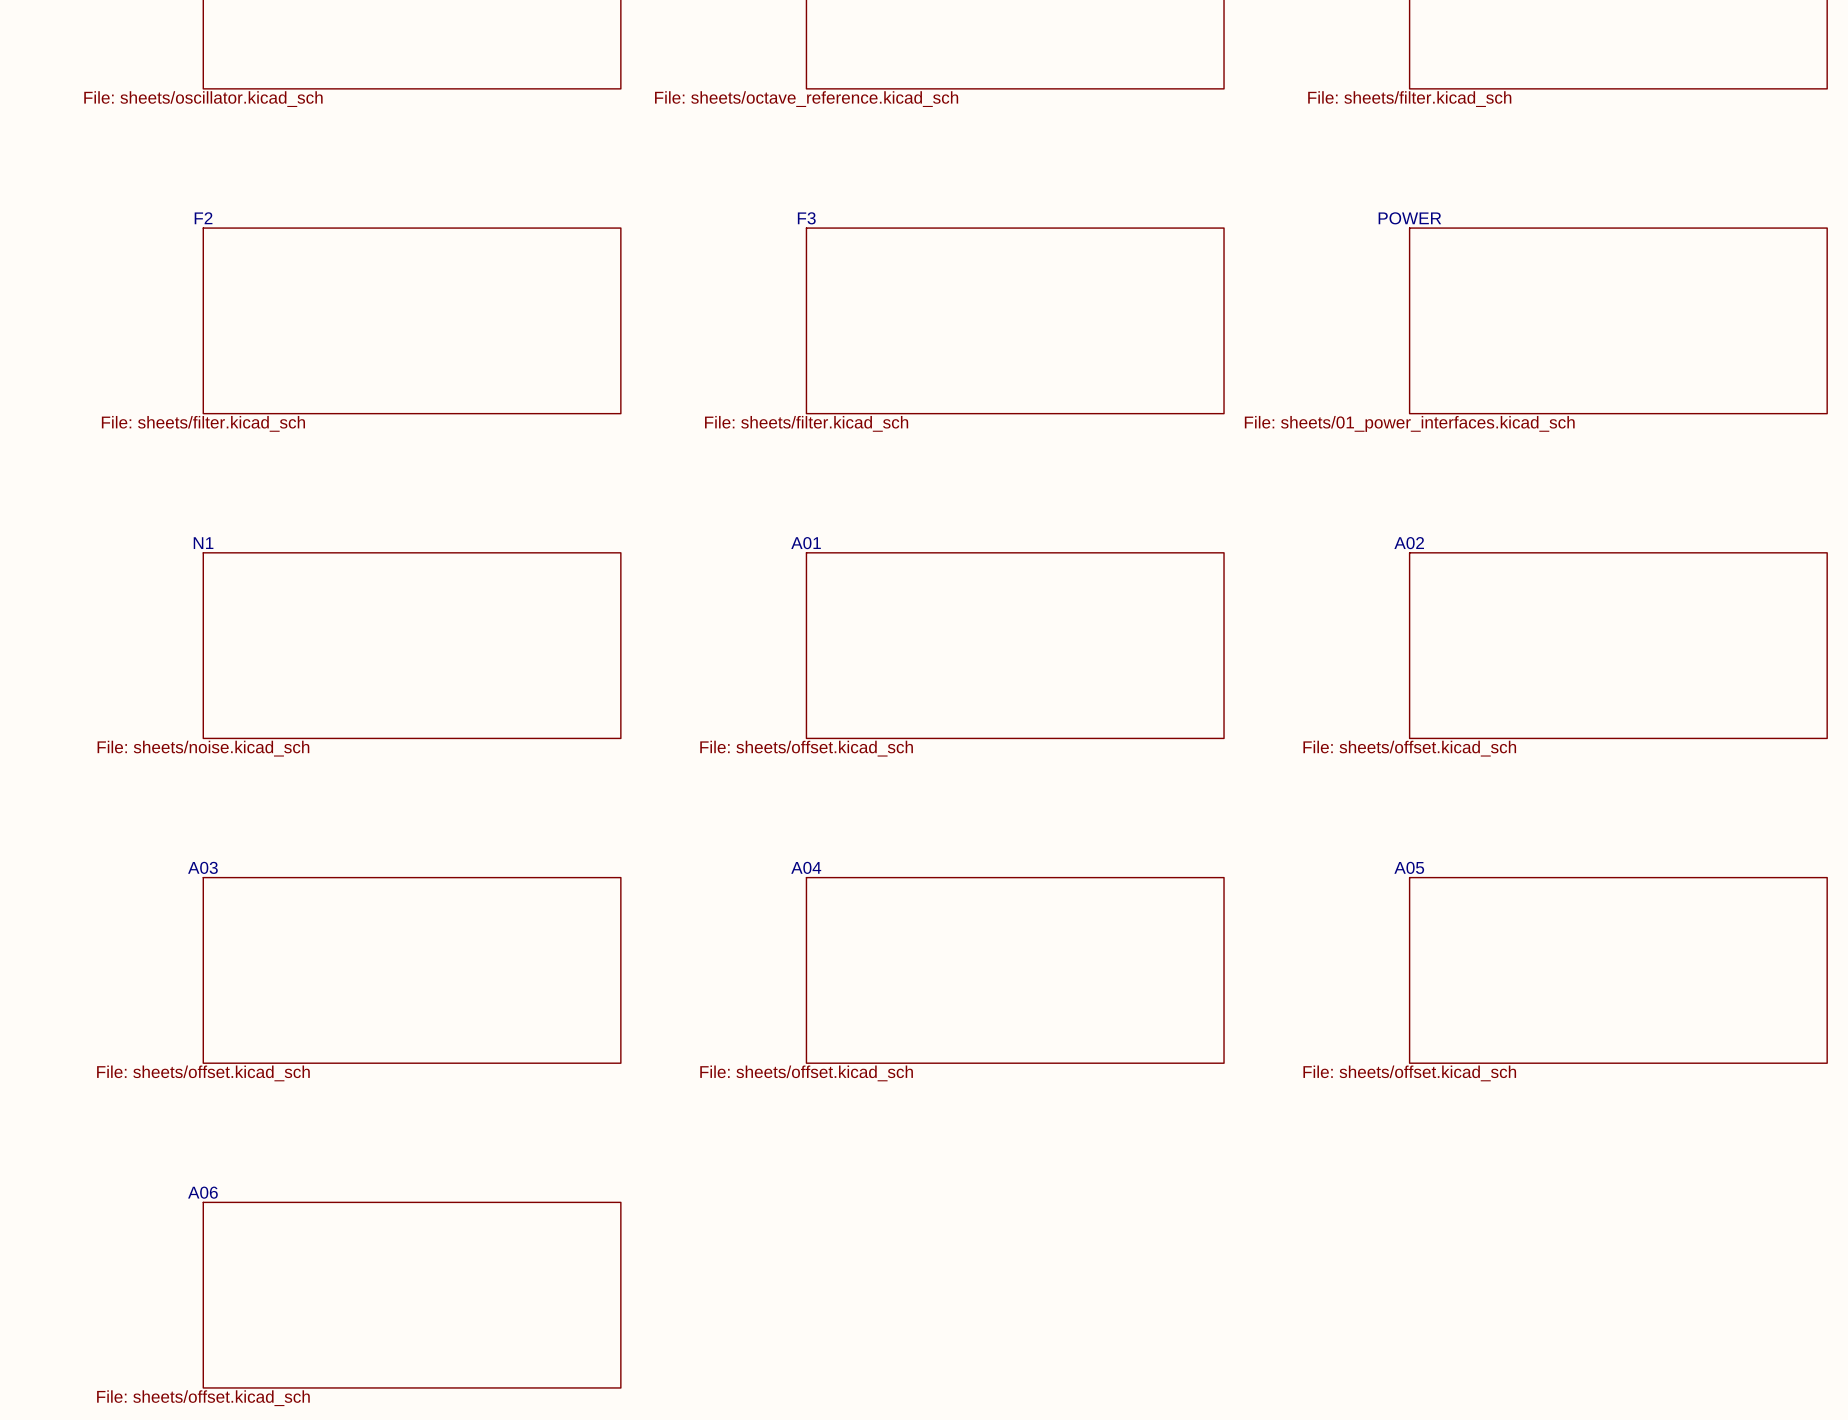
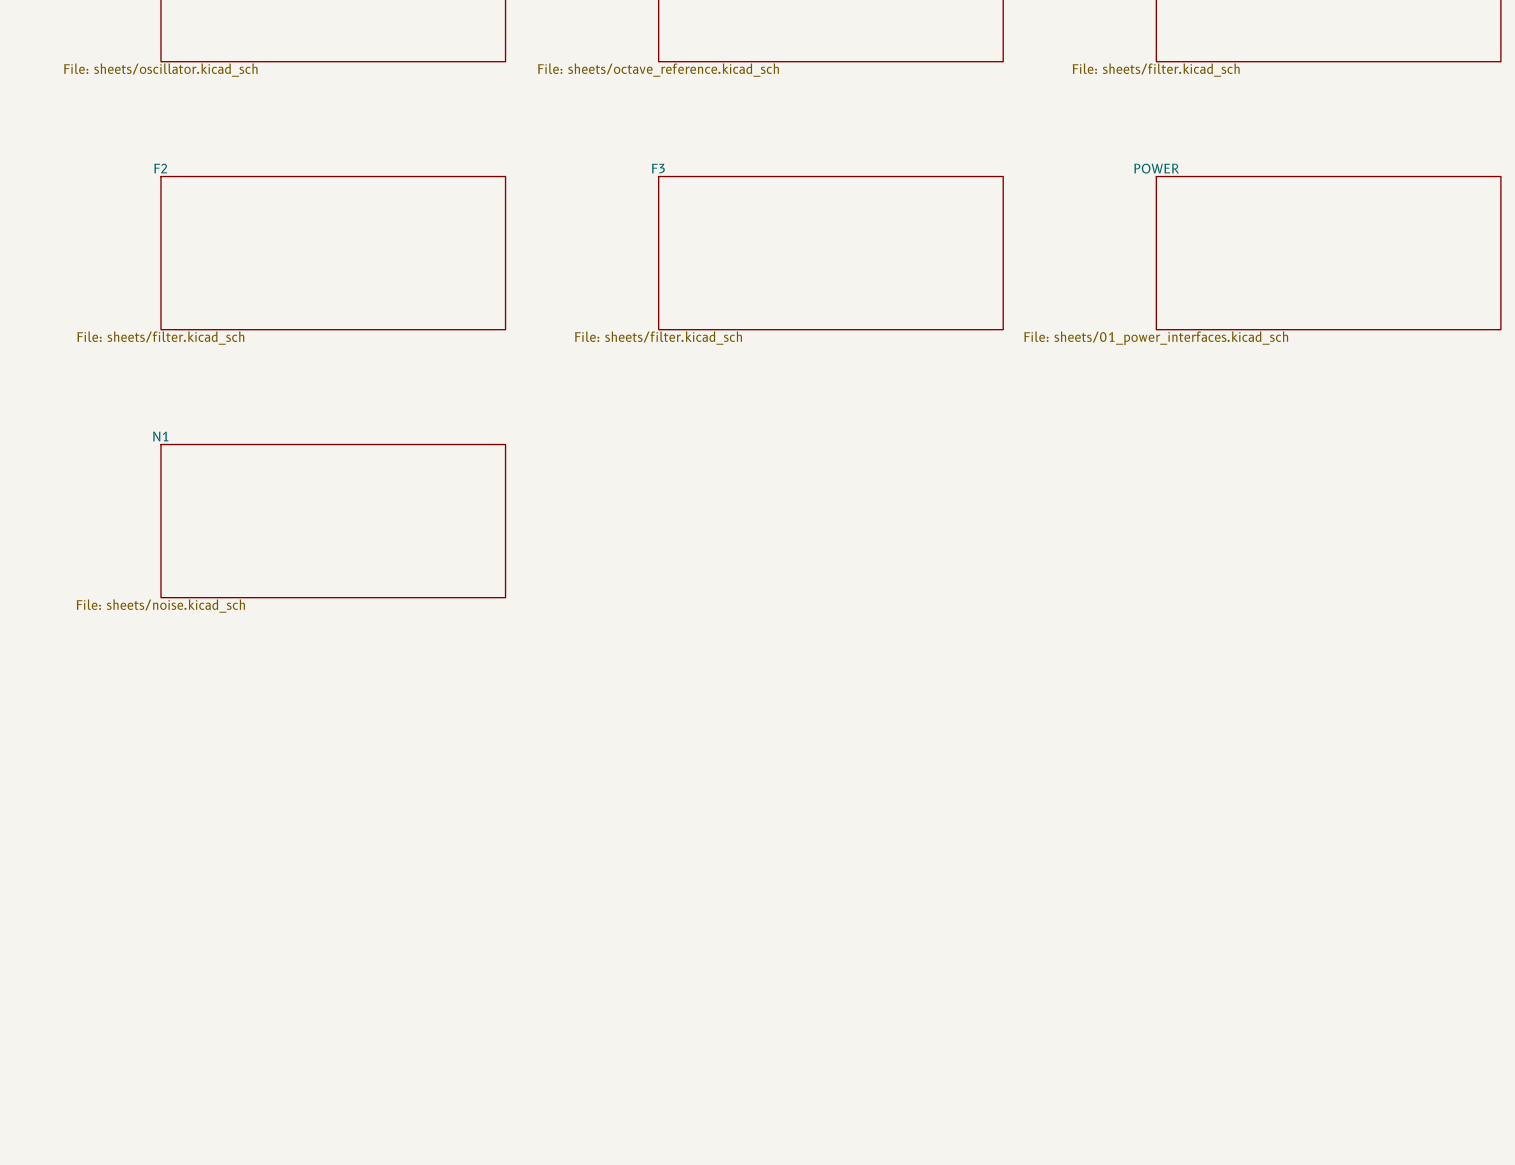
sheet A01: File: sheets/offset.kicad_sch (1015, 645) -> none
sheet A02: File: sheets/offset.kicad_sch (1618, 645) -> none
sheet A03: File: sheets/offset.kicad_sch (412, 970) -> none
sheet A04: File: sheets/offset.kicad_sch (1015, 970) -> none
sheet A05: File: sheets/offset.kicad_sch (1618, 970) -> none
sheet A06: File: sheets/offset.kicad_sch (412, 1295) -> none

